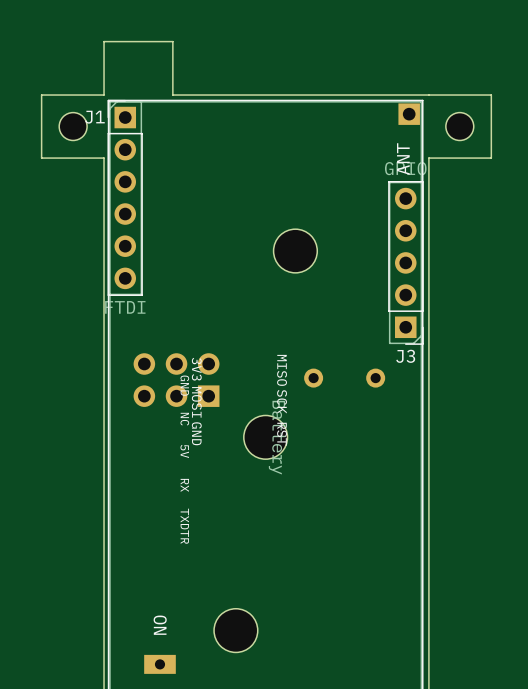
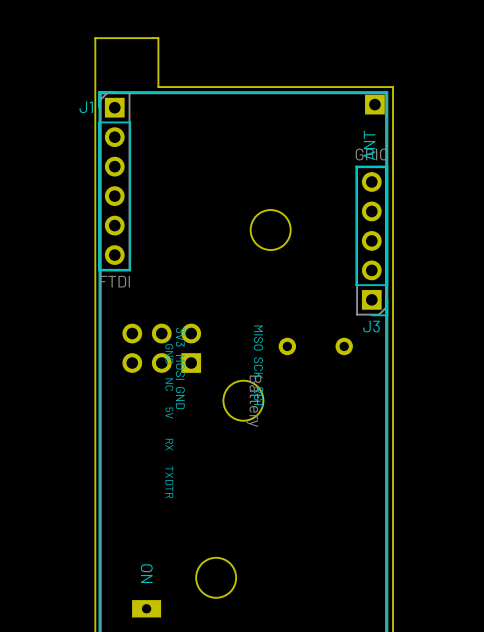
board edge: (104, 95) (41, 95) (41, 158) (104, 158) -> (95, 87) (95, 144)
board edge: (428, 95) (491, 95) (491, 158) (428, 158) -> (393, 87) (393, 144)
part: (73, 126) -> none
part: (459, 126) -> none

